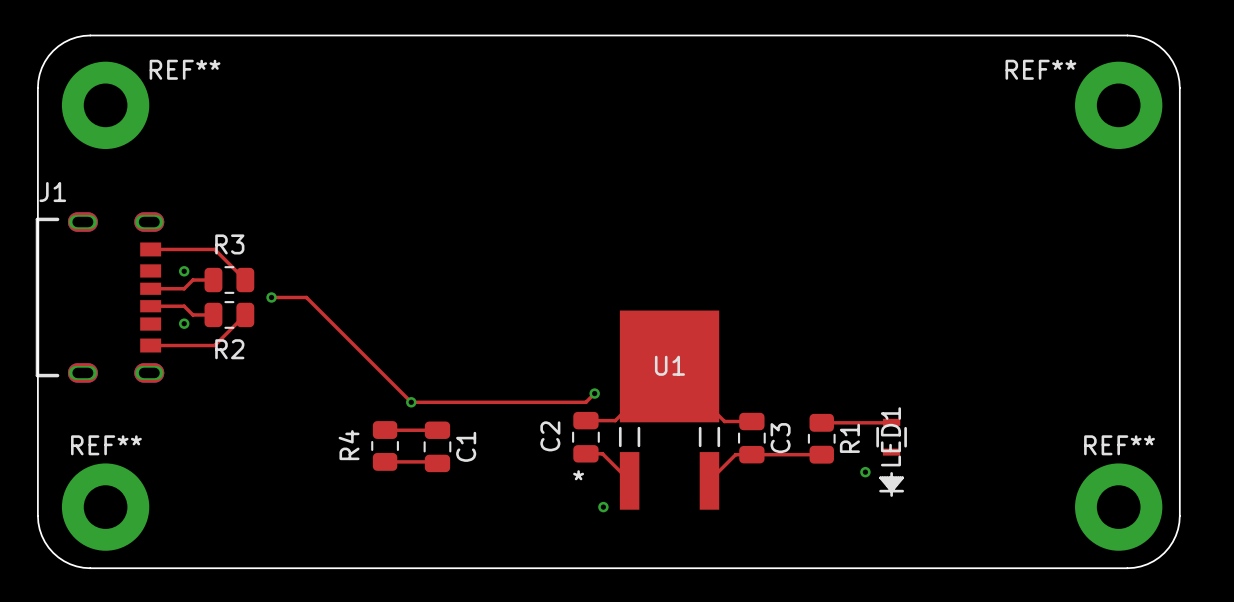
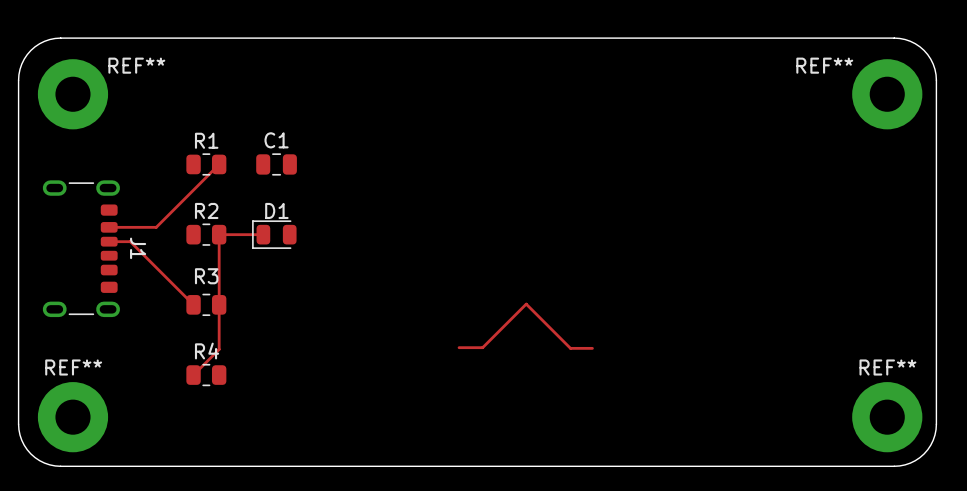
J1 name position: J1 (52, 192) -> J1 (138, 248)
top track: none -> (219, 164) (156, 227) (109, 227)
J1 footprint: [35, 212, 165, 383] -> [42, 180, 121, 318]
top track: (150, 249) (214, 249) (245, 280) -> none
via: (184, 271) -> none
top track: (213, 280) (192, 280) (184, 288) (176, 288) -> (193, 304) (130, 241)
R3 position: (229, 280) -> (206, 304)
top track: none -> (263, 234) (219, 234) (219, 349) (193, 375)
D1: none -> (274, 234)
top track: (271, 297) (306, 297) (411, 402) (585, 402) (594, 393) -> none
via: (271, 297) -> none
top track: (150, 306) (184, 306) (192, 314) (213, 314) -> none
R2 position: (229, 314) -> (206, 234)
top track: (245, 314) (214, 345) (150, 345) -> none
via: (184, 323) -> none
R2 name position: R2 (229, 349) -> R2 (206, 210)
via: (594, 393) -> none
via: (411, 402) -> none
U1: (669, 410) -> none
top track: (891, 422) (821, 422) -> none
top track: (385, 430) (437, 430) -> none
C2: (585, 437) -> none
C3: (751, 438) -> none
R1 rotation: 0° (821, 438) -> 90° clockwise (206, 164)
R1 position: (821, 438) -> (206, 164)
R1 name position: R1 (849, 438) -> R1 (206, 140)
R4 rotation: 0° (385, 445) -> 90° clockwise (206, 375)
R4 position: (385, 445) -> (206, 375)
C1 rotation: 0° (437, 446) -> 90° clockwise (276, 164)
C1 position: (437, 446) -> (276, 164)
C1 name position: C1 (466, 446) -> C1 (276, 140)
top track: (585, 453) (602, 453) (629, 480) -> none
top track: (821, 454) (735, 454) (709, 480) -> none
LED1: (891, 457) -> none
top track: (385, 461) (437, 463) -> none
via: (865, 472) -> none
via: (603, 507) -> none

